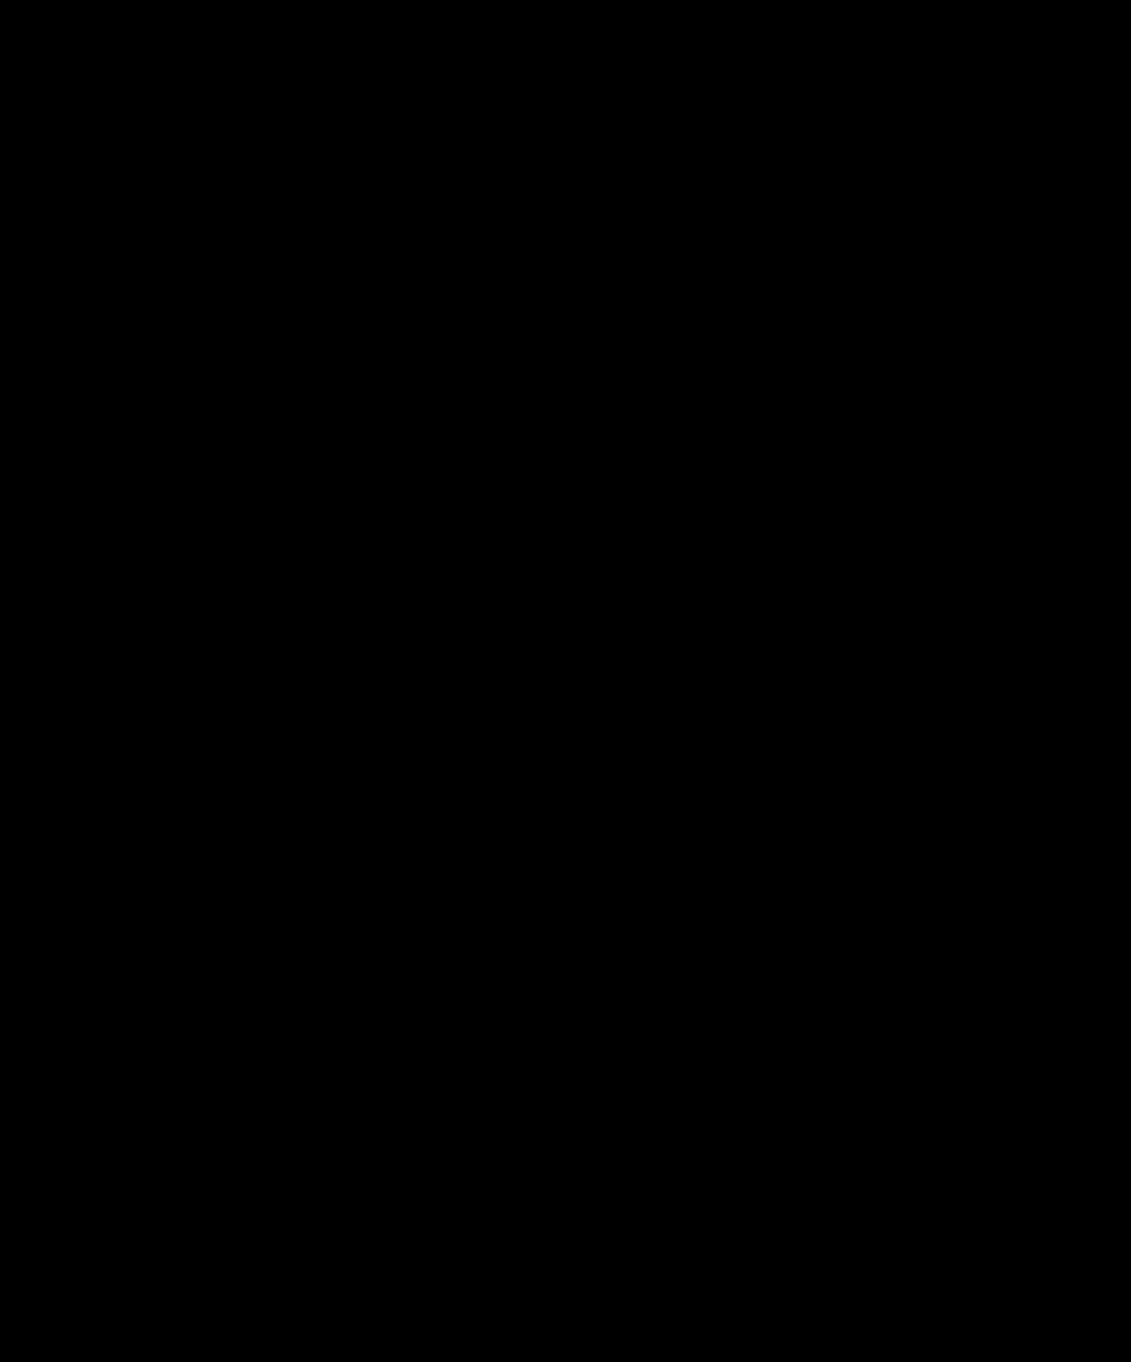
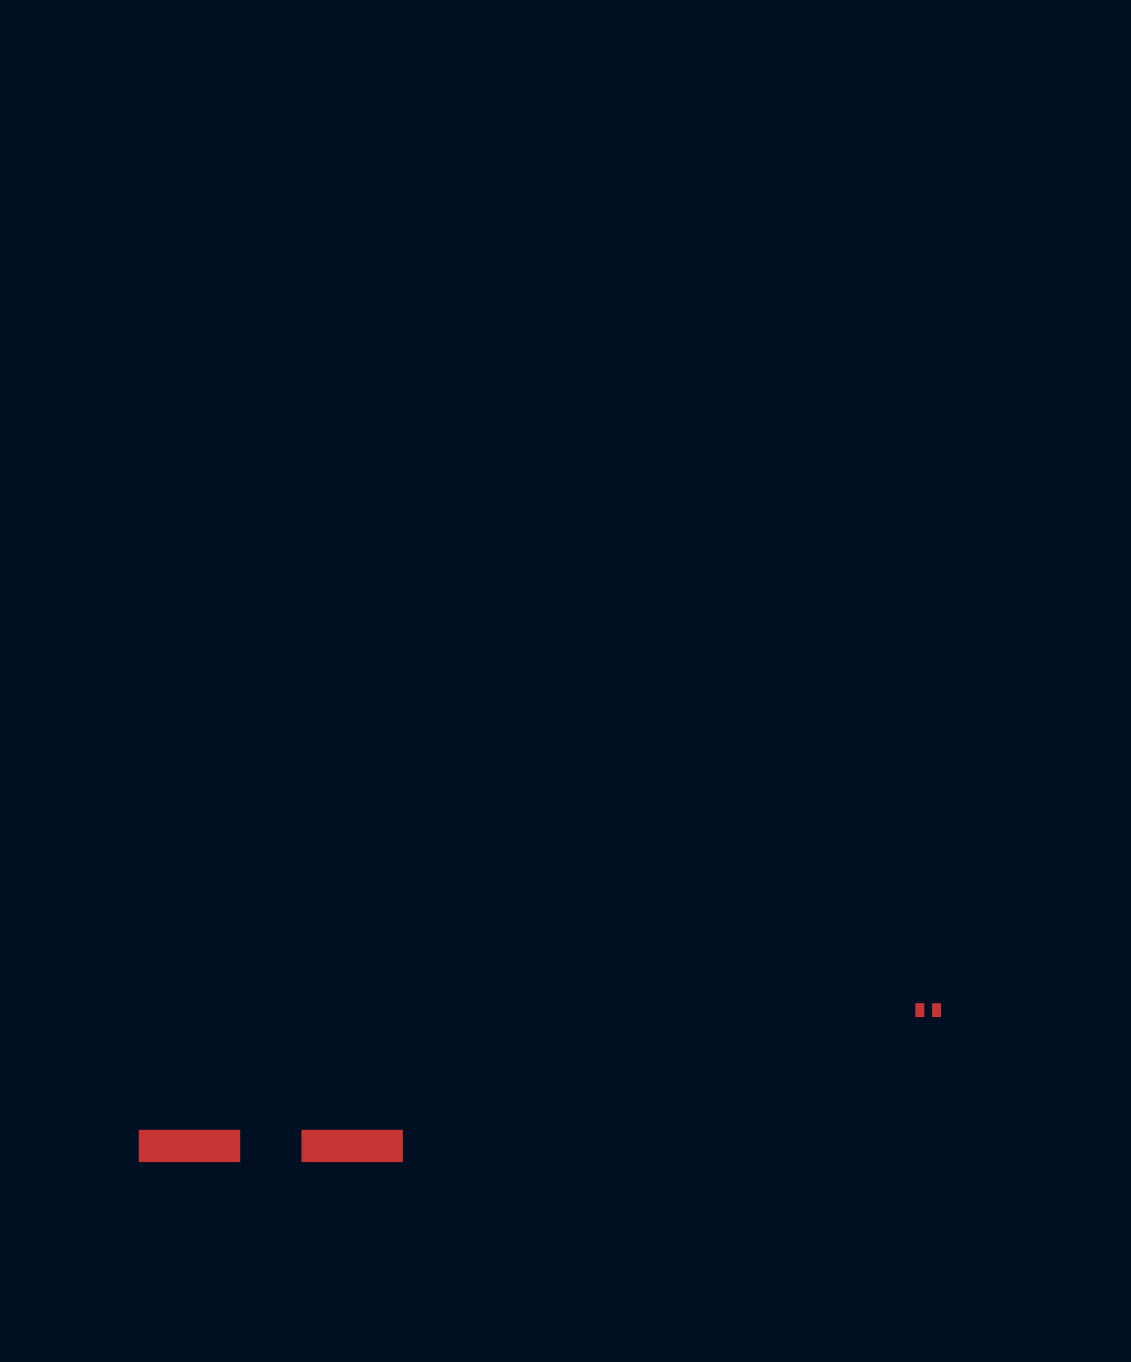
part: none -> (928, 1010)
part: none -> (270, 1145)

